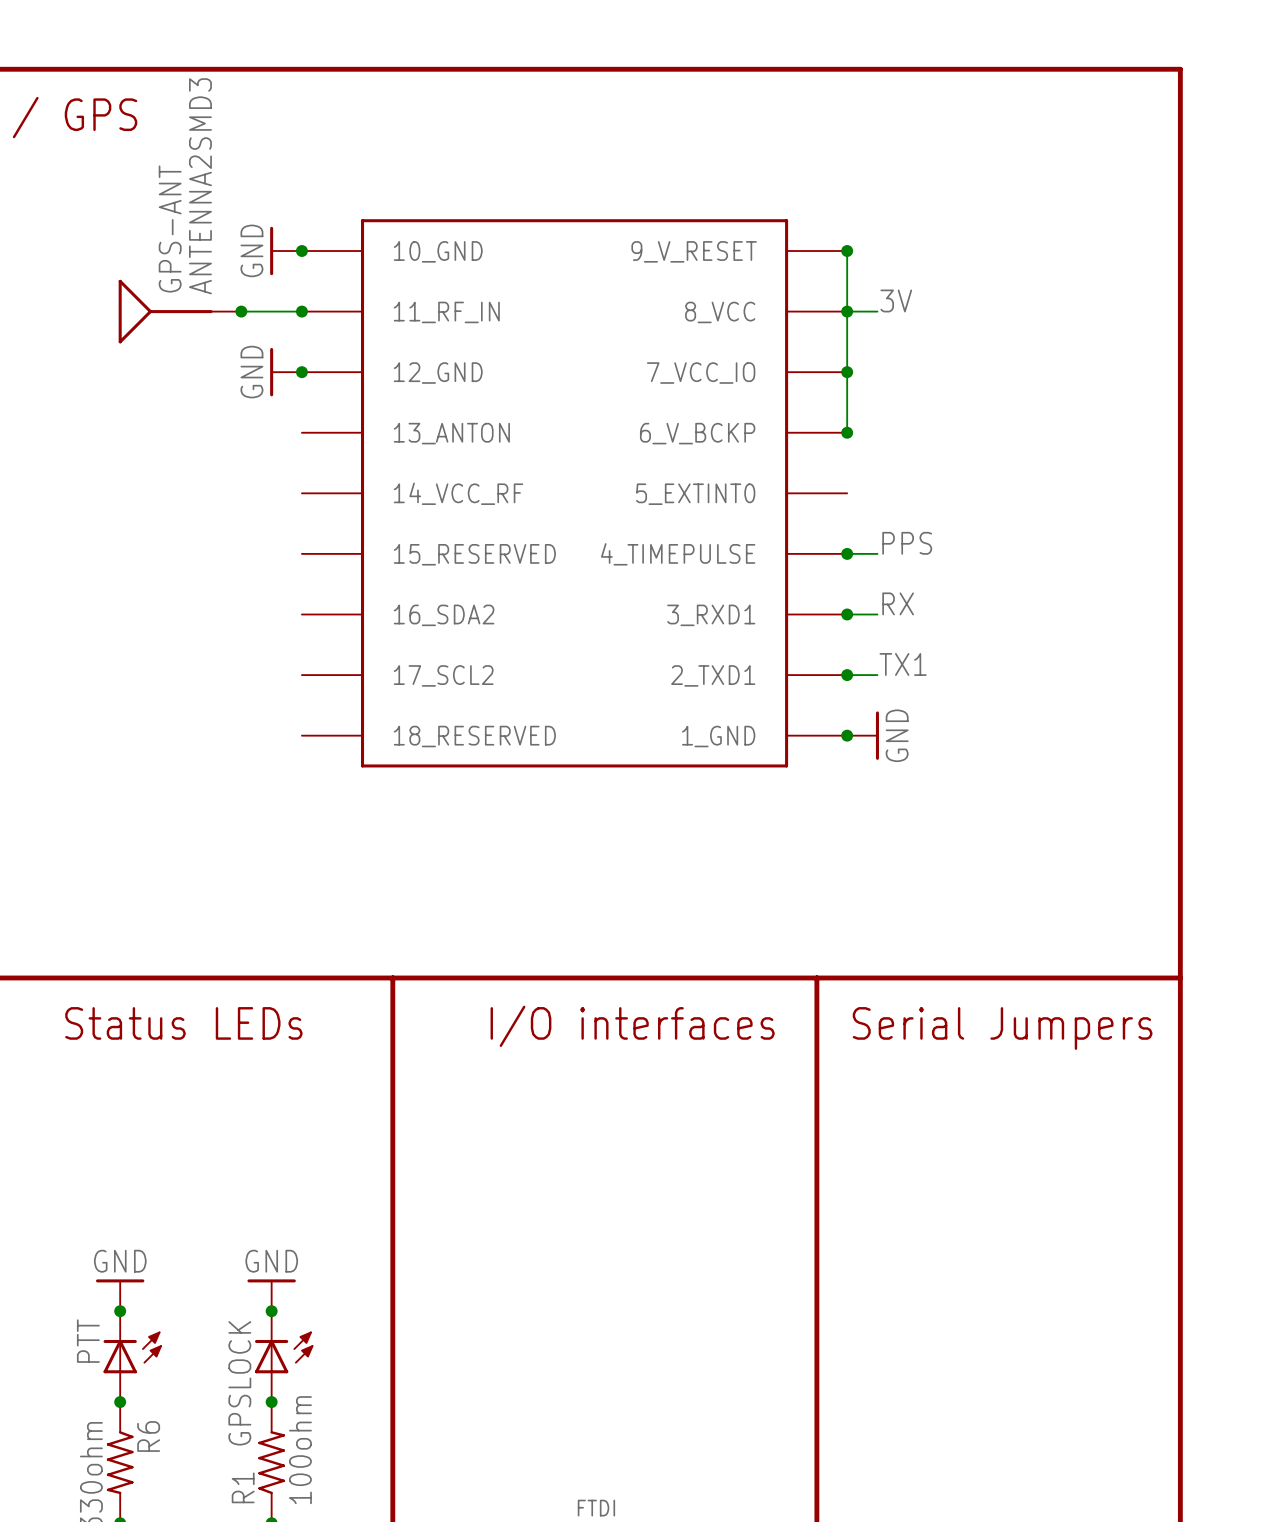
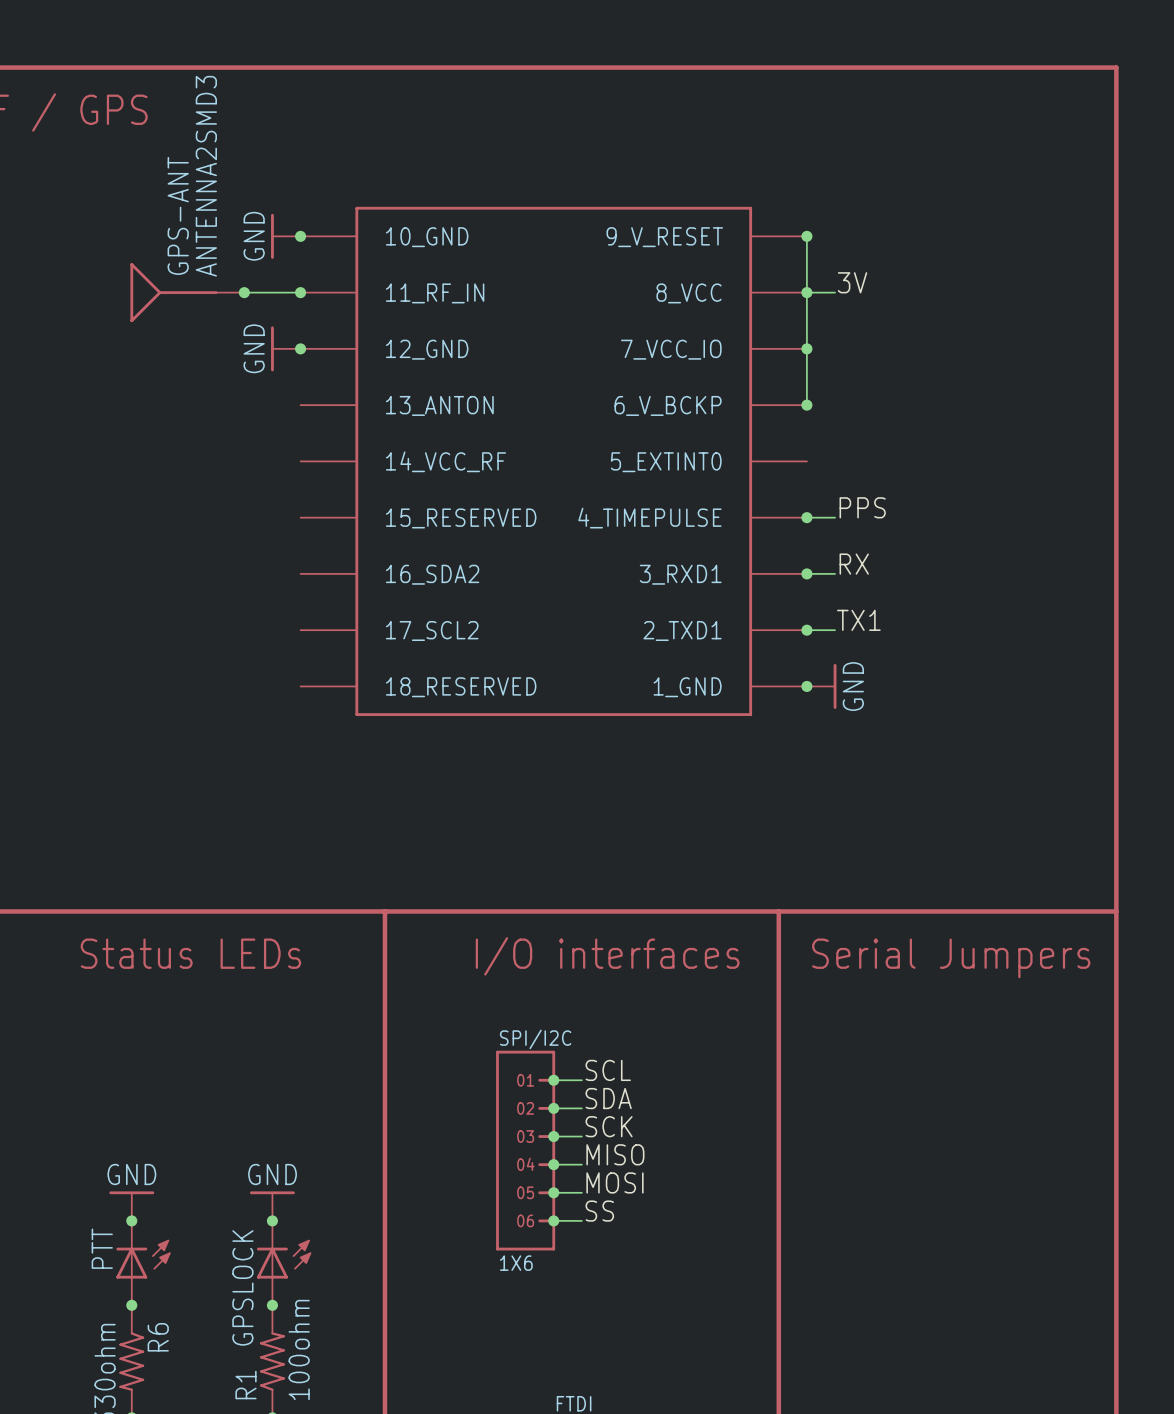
label: none -> SCL (608, 1070)
wire: none -> (553, 1080) (581, 1080)
junction: none -> (553, 1080)
label: none -> SDA (608, 1098)
wire: none -> (553, 1108) (581, 1108)
junction: none -> (553, 1108)
label: none -> SCK (609, 1126)
wire: none -> (553, 1136) (581, 1136)
junction: none -> (553, 1136)
SPI/I2C: none -> 1X6 (525, 1150)
label: none -> MISO (615, 1154)
wire: none -> (553, 1164) (581, 1164)
junction: none -> (553, 1164)
label: none -> MOSI (614, 1182)
wire: none -> (553, 1192) (581, 1192)
junction: none -> (553, 1192)
label: none -> SS (599, 1211)
wire: none -> (553, 1220) (581, 1220)
junction: none -> (553, 1220)

